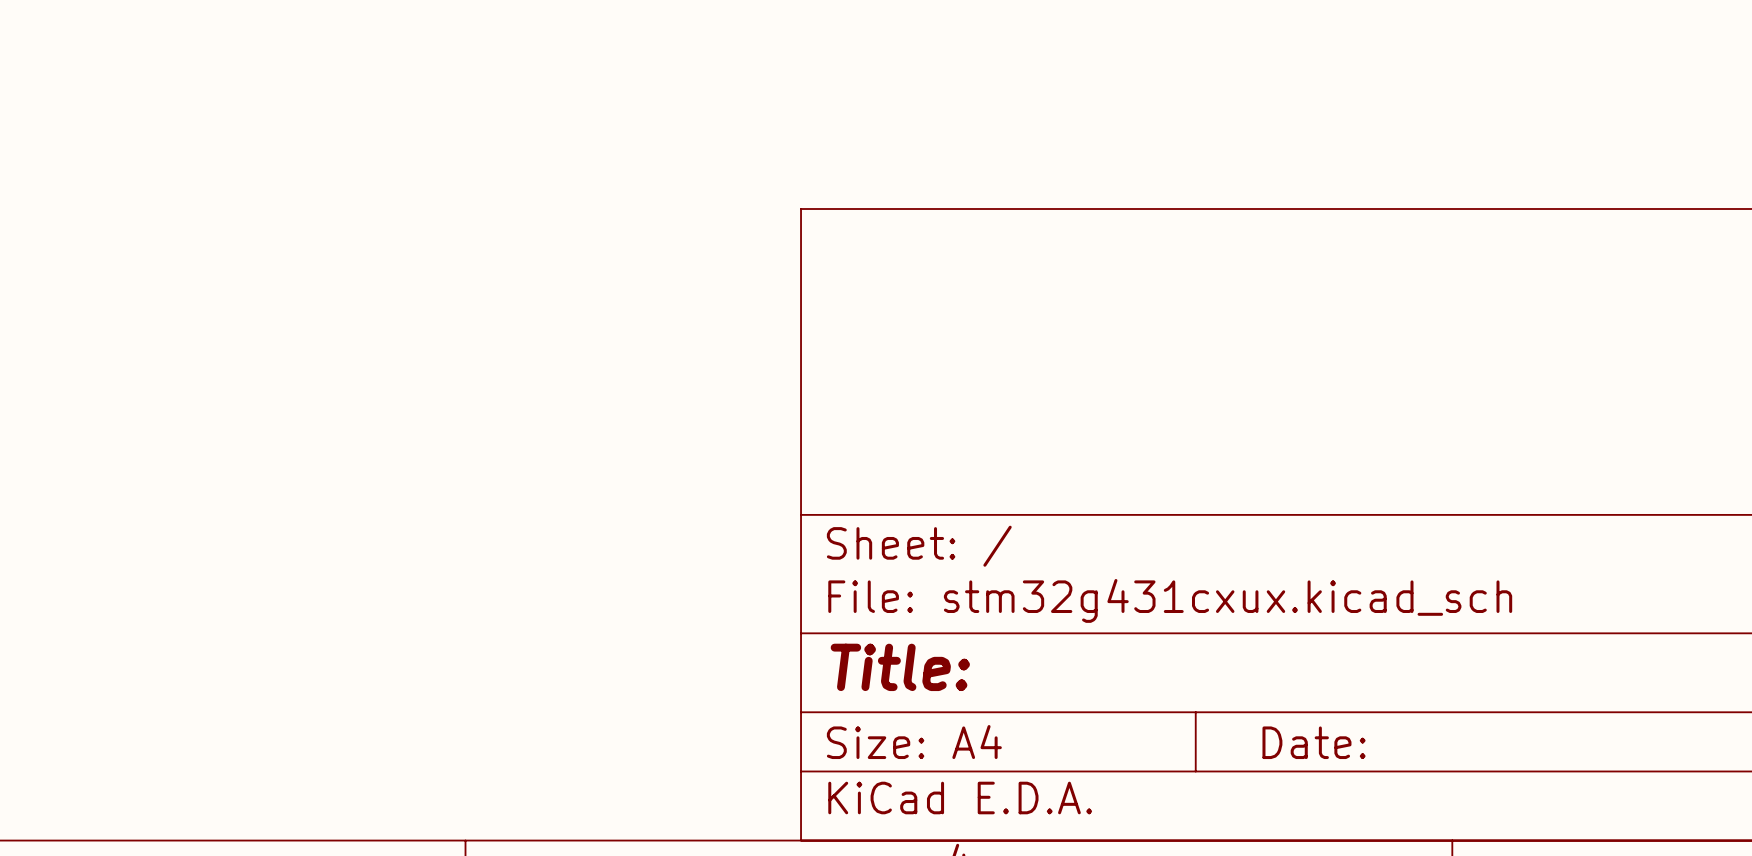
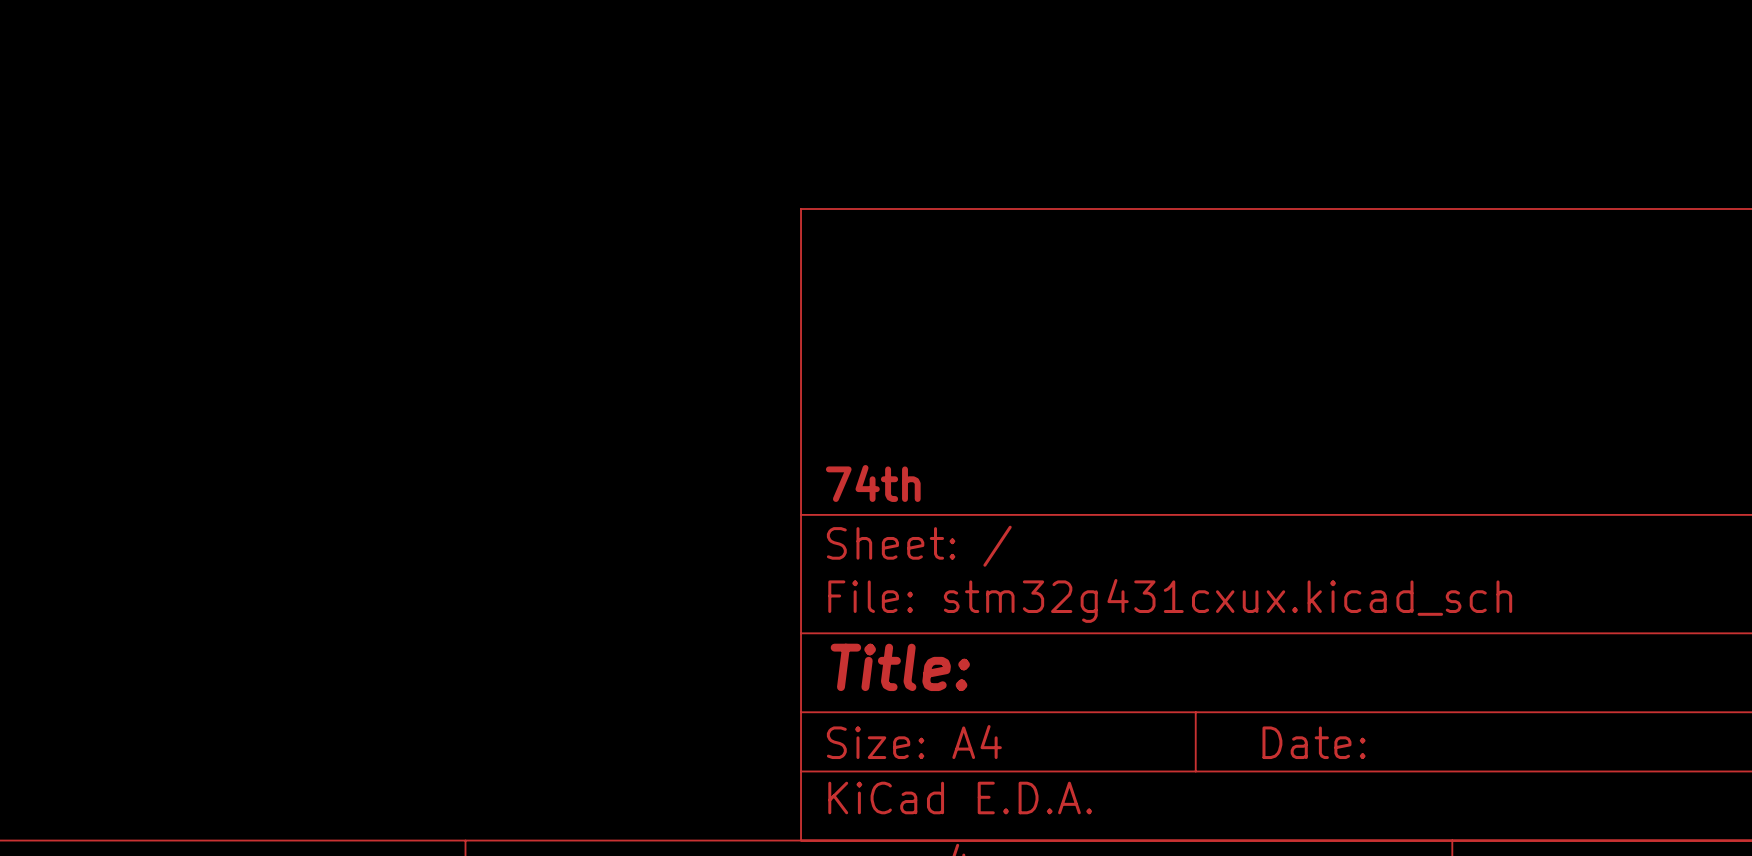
title block: none -> 74th (873, 483)

